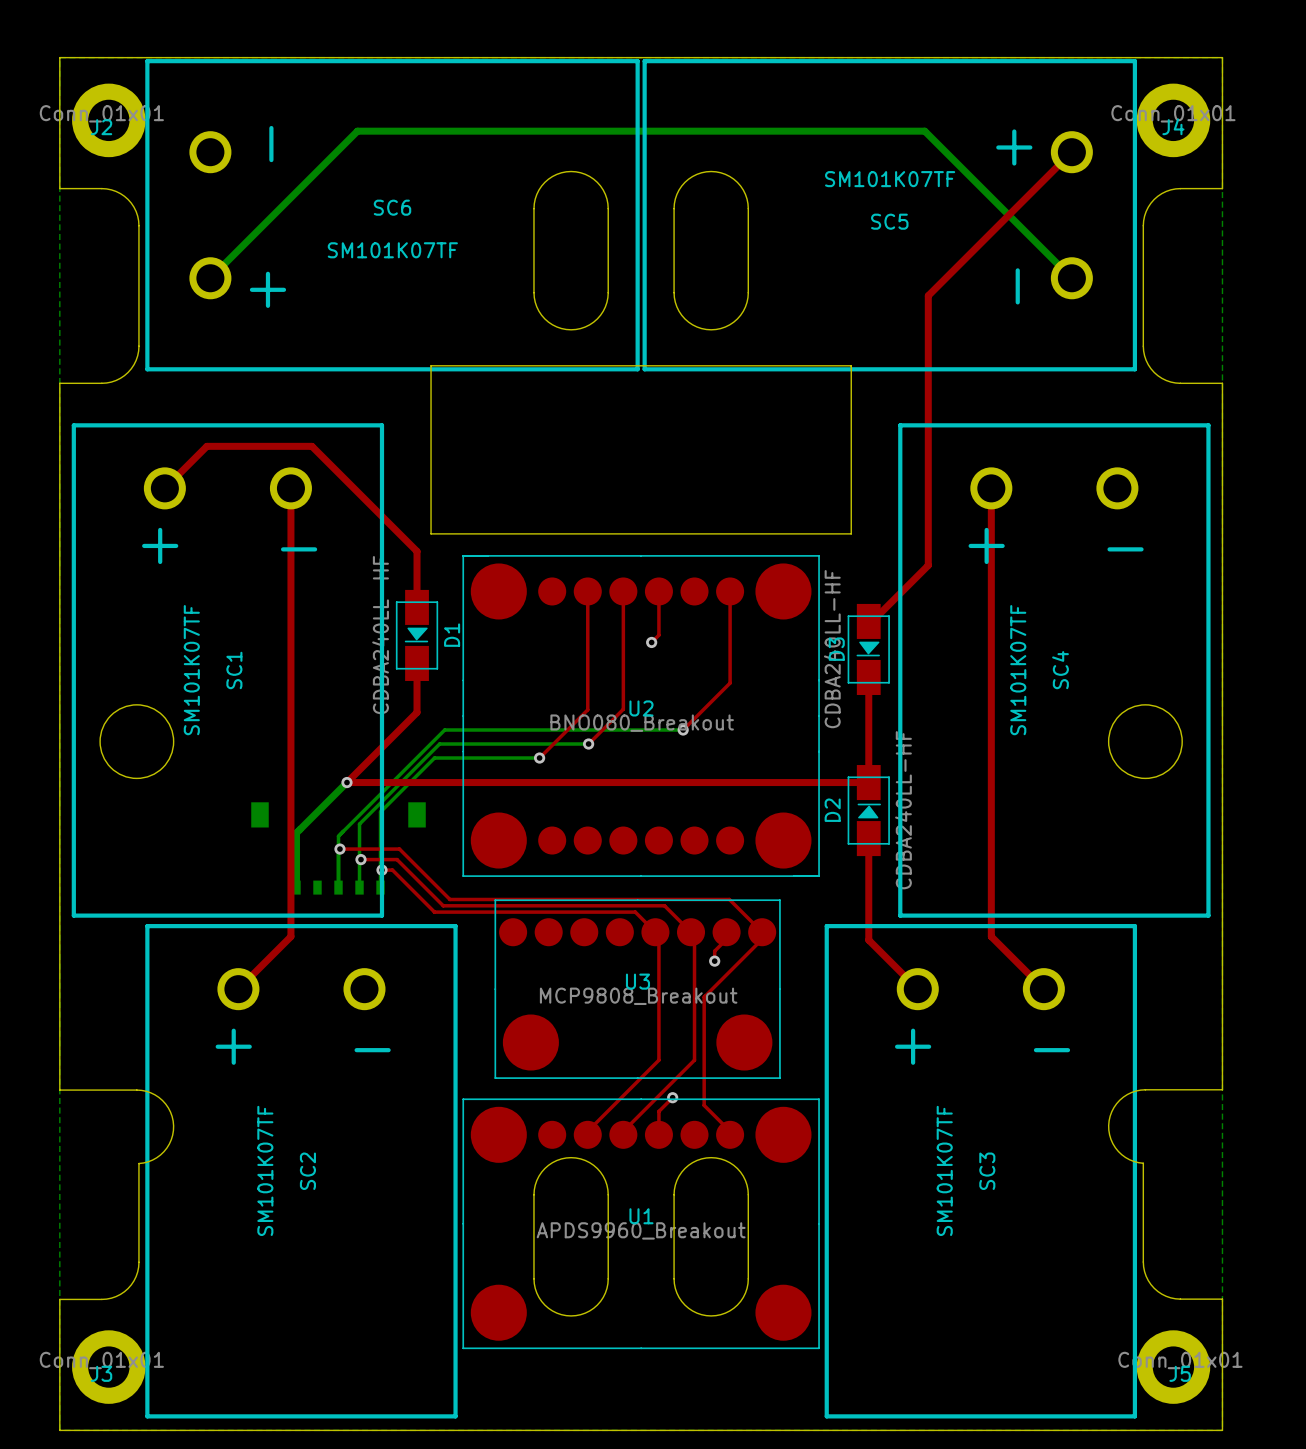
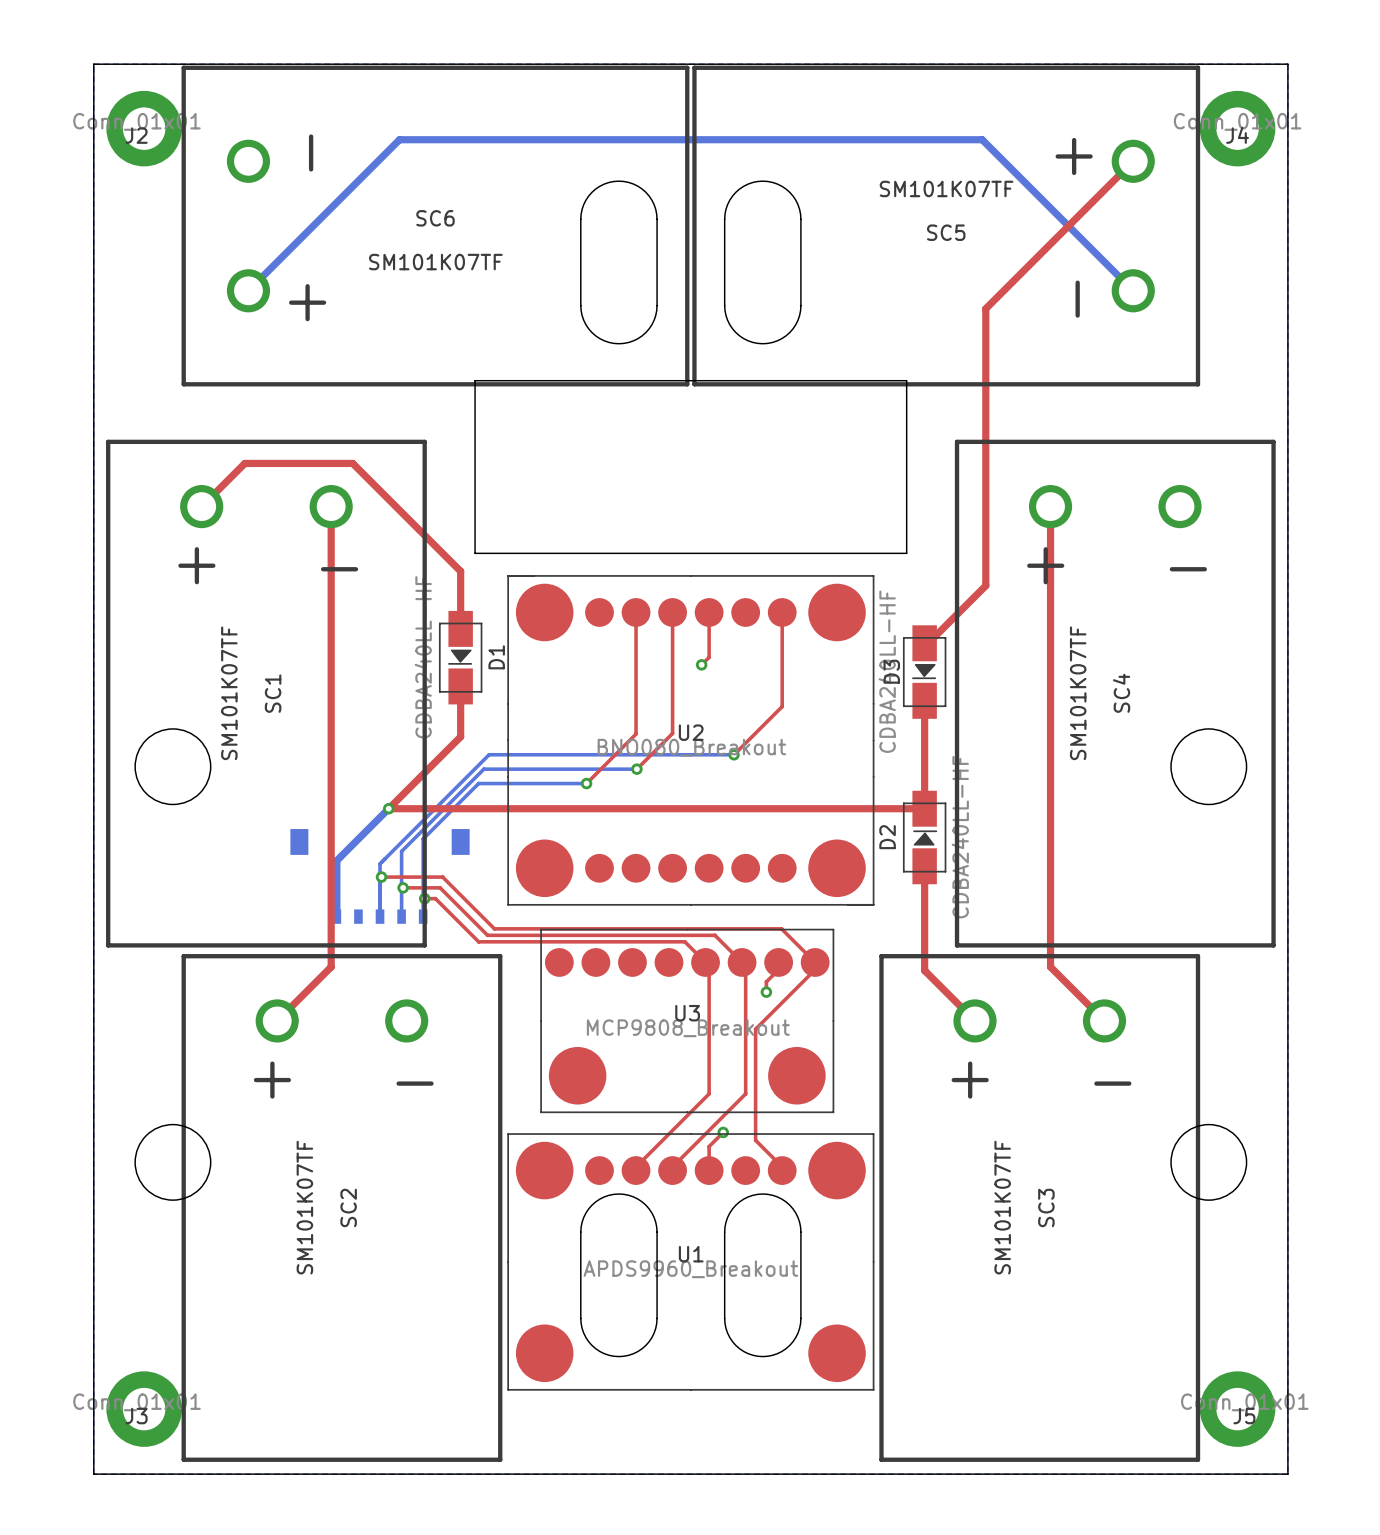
board edge: (59, 188) (101, 188) (116, 191) (131, 203) (136, 211) (138, 225) (138, 346) (133, 364) (124, 375) (111, 382) (59, 383) -> (93, 198) (93, 398)
board edge: (1222, 188) (1180, 188) (1166, 191) (1157, 196) (1148, 207) (1143, 225) (1143, 346) (1148, 364) (1157, 375) (1170, 382) (1222, 383) -> (1287, 198) (1287, 398)
round board edge: none -> [134, 1124, 212, 1201]
round board edge: none -> [1170, 1124, 1247, 1201]
board edge: (1222, 1089) (1136, 1091) (1123, 1097) (1116, 1103) (1110, 1116) (1108, 1125) (1110, 1139) (1118, 1151) (1129, 1159) (1143, 1163) (1143, 1262) (1148, 1280) (1157, 1291) (1170, 1297) (1222, 1299) -> (1287, 1124) (1287, 1339)
board edge: (59, 1090) (136, 1090) -> none
board edge: (136, 1090) (150, 1092) (162, 1100) (170, 1112) (173, 1125) (171, 1139) (163, 1151) (152, 1160) (138, 1163) (138, 1262) (136, 1276) (124, 1291) (111, 1298) (59, 1299) -> (93, 1124) (93, 1339)

